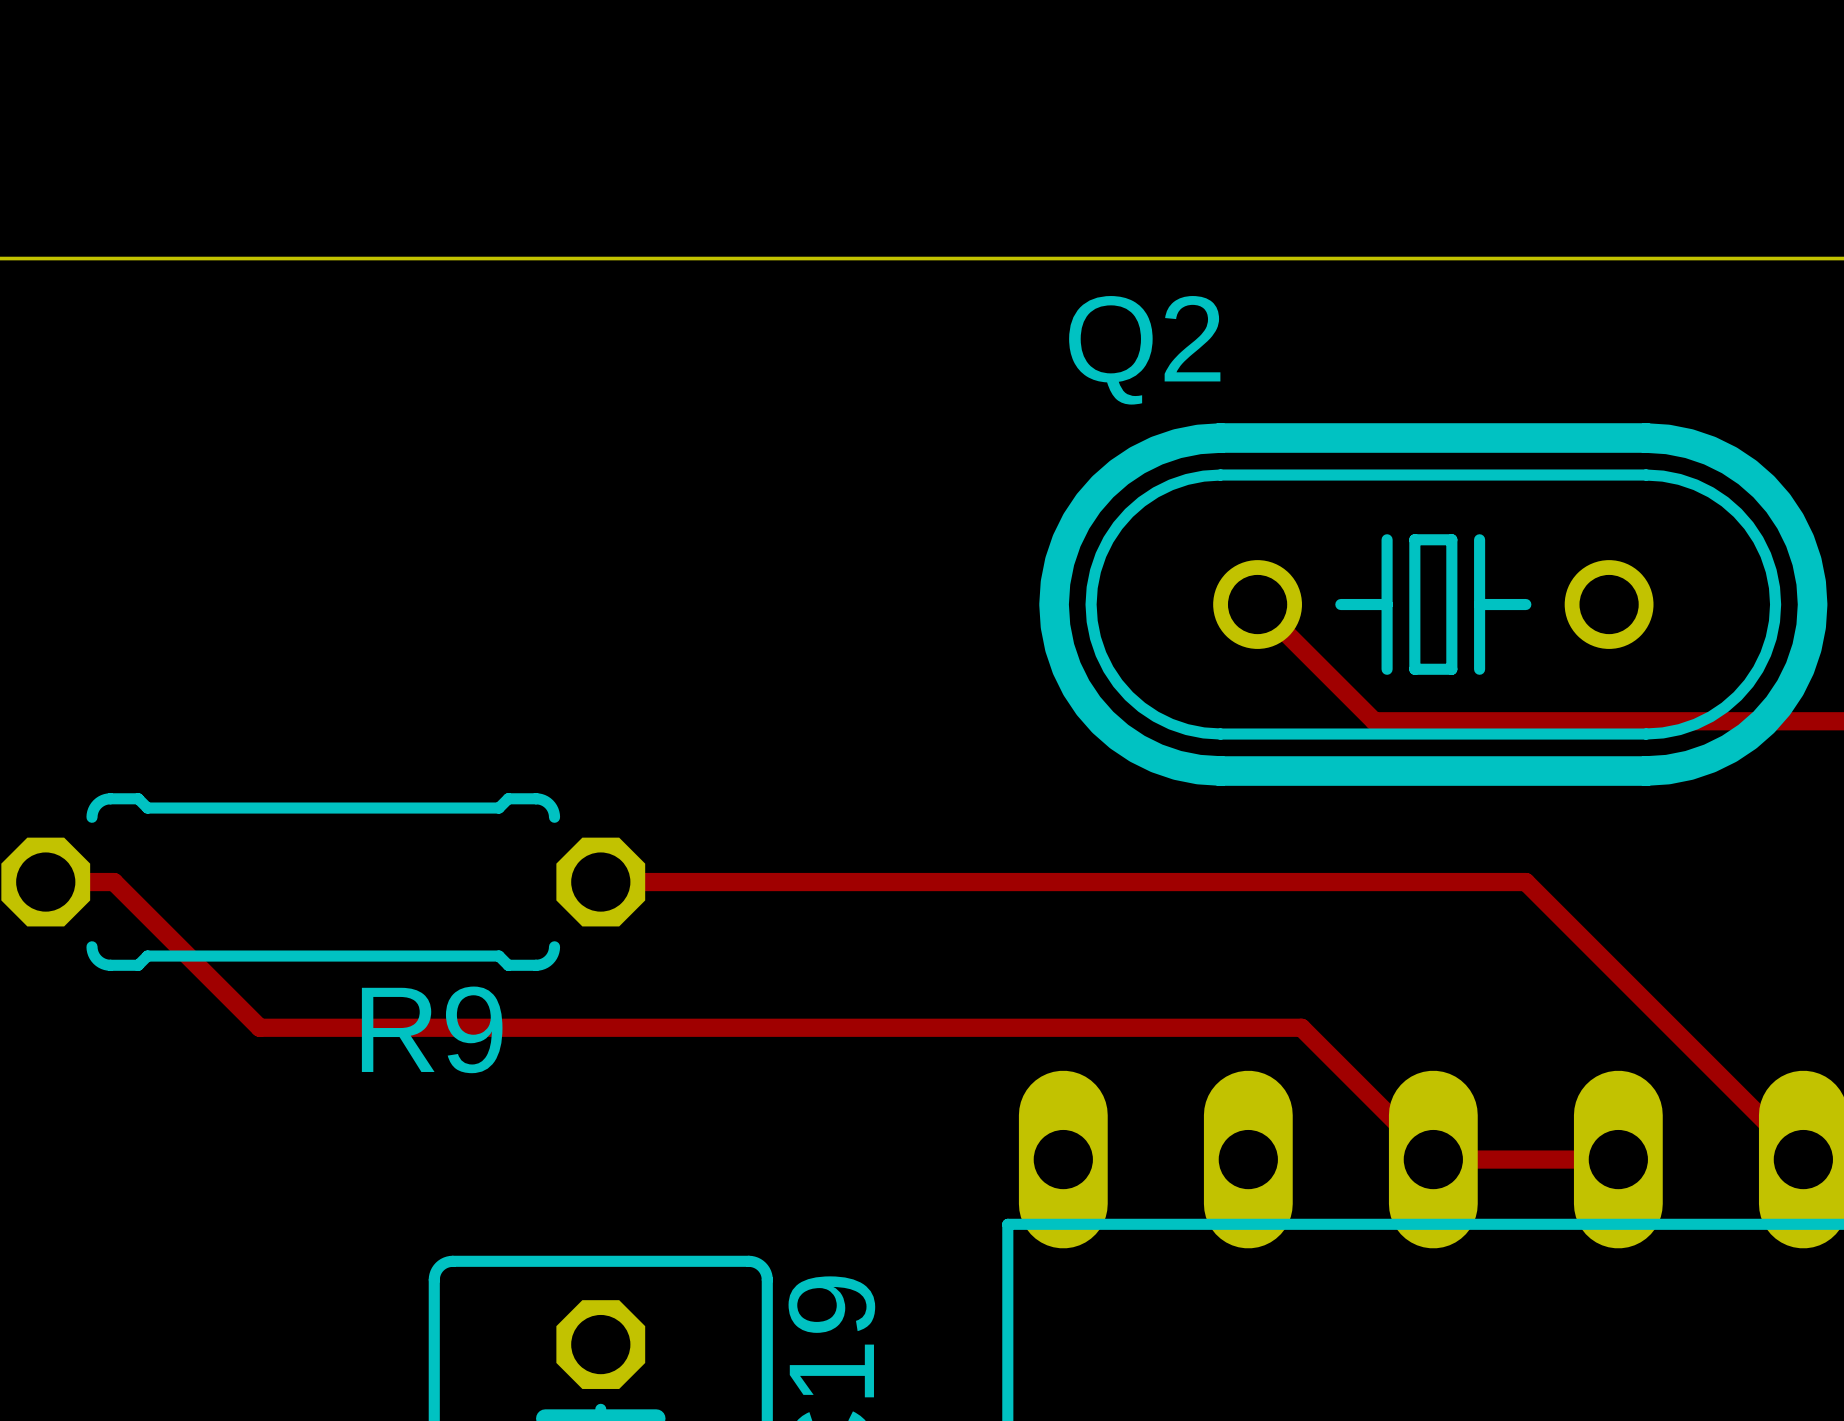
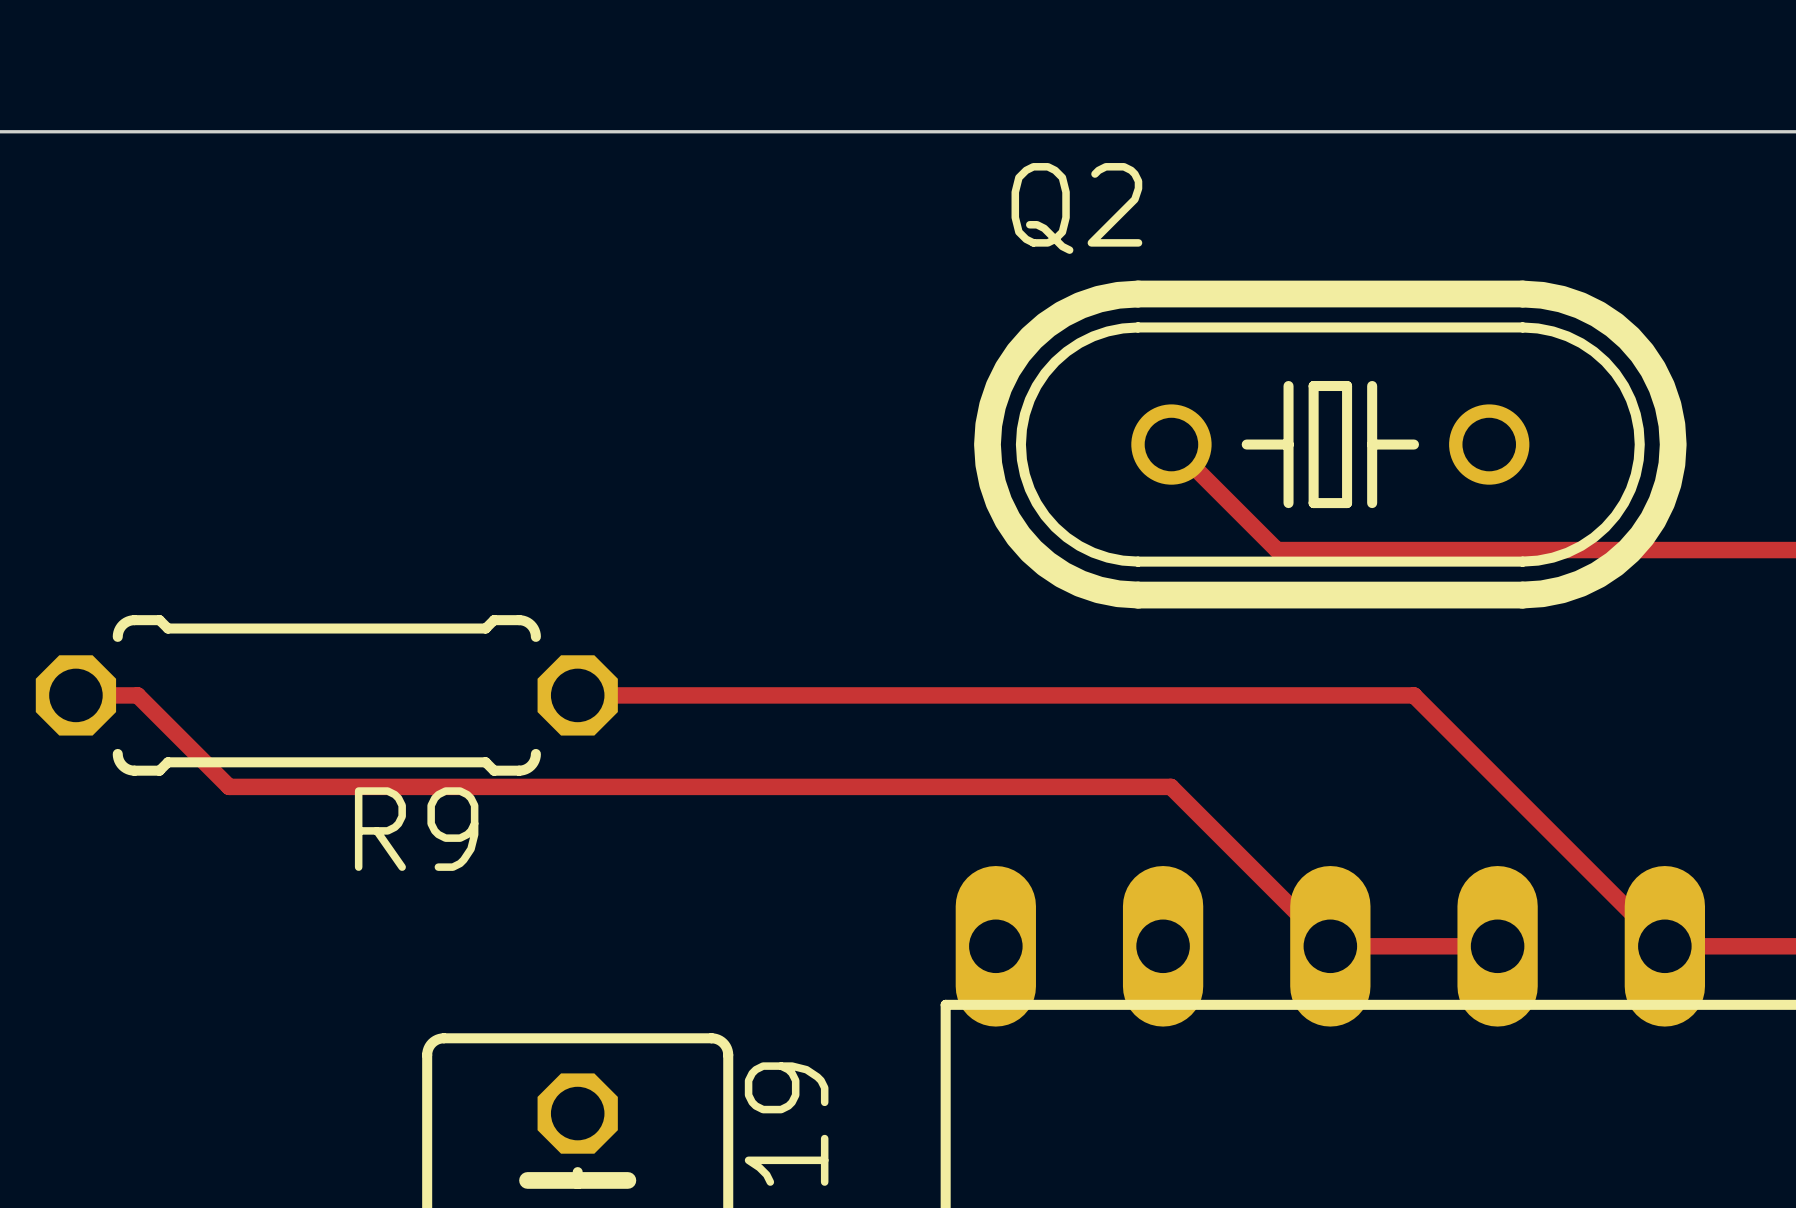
track: (215, 983) (259, 1027) (1301, 1027) -> (229, 786) (1170, 786) (1211, 827)

